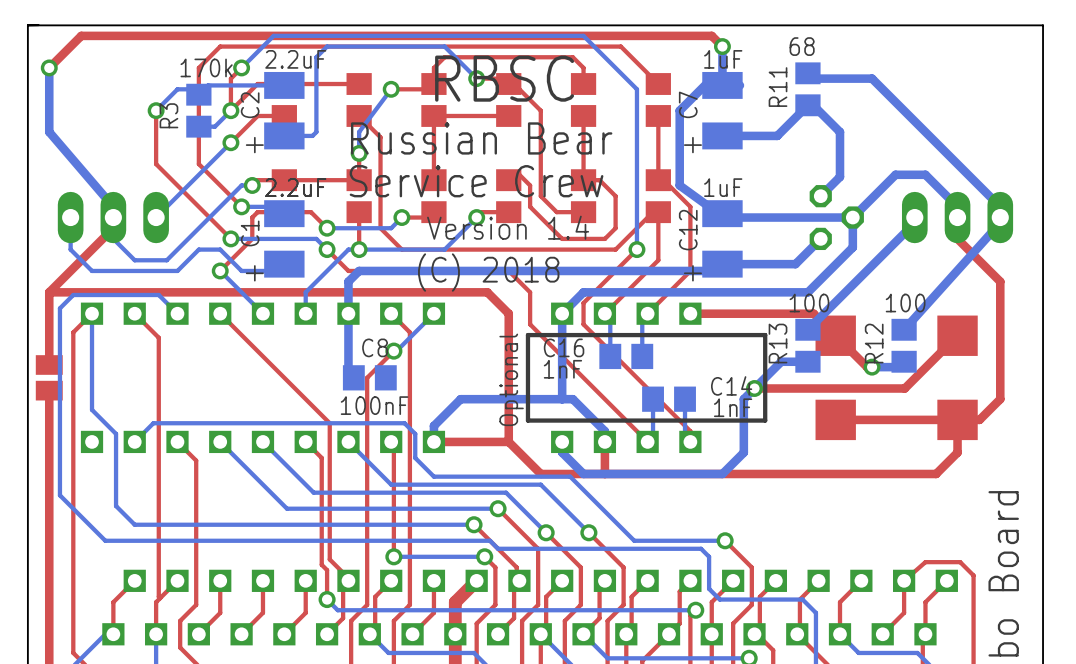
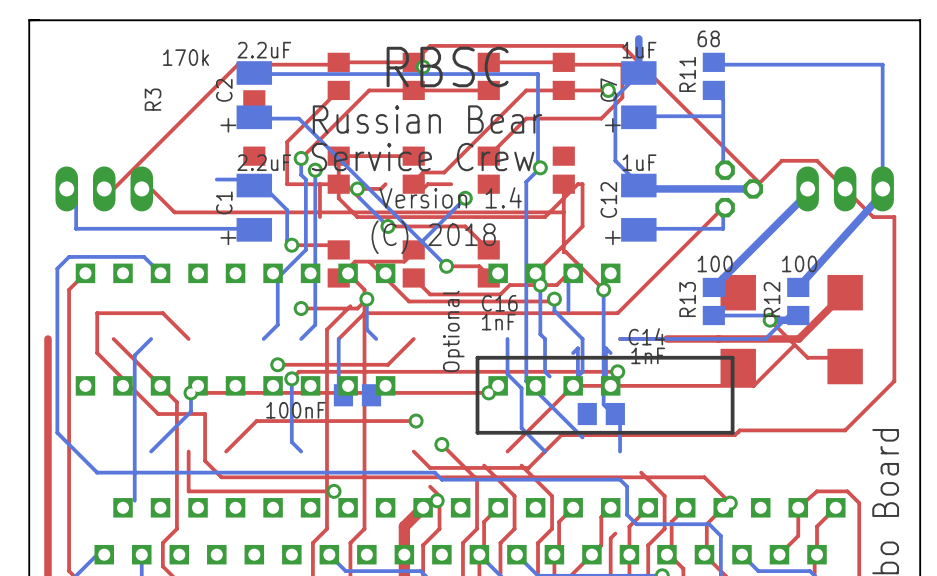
top track: (722, 46) (711, 35) (81, 35) (49, 67) -> none
via: (722, 46) -> none
bottom track: (49, 67) (49, 132) (113, 206) (113, 238) (134, 260) (166, 260) (241, 185) (252, 185) -> none
via: (49, 67) -> none
top track: (241, 67) (230, 78) (230, 110) -> (113, 188) (207, 95)
bottom track: (241, 67) (273, 35) (583, 35) (636, 89) (636, 249) -> none
via: (241, 67) -> none
top track: none -> (488, 62) (622, 64) (622, 97) (601, 118) (526, 118) (488, 156)
bottom track: (807, 73) (813, 78) (872, 78) (1000, 206) -> (713, 62) (713, 64) (882, 64) (882, 179)
top track: (476, 78) (503, 78) (514, 89) (519, 89) (540, 110) (540, 196) (556, 212) (583, 212) -> none
bottom track: (476, 78) (444, 46) (327, 46) (316, 57) (316, 132) (312, 135) (284, 135) -> none
top track: (359, 84) (257, 84) -> (430, 467) (528, 467) (561, 435) (734, 435) (739, 430) (845, 430) (894, 381) (894, 217) (873, 217) (817, 160) (781, 160) (753, 188) (758, 181) (622, 45) (430, 45) (413, 62) (237, 64) (230, 71)
top track: (583, 84) (583, 67) (572, 57) (444, 57) (433, 67) (433, 84) (428, 89) (391, 89) -> none
top track: (658, 84) (620, 46) (220, 46) (198, 67) (198, 164) (241, 206) -> none
bottom track: (284, 85) (208, 85) (198, 94) (193, 89) (177, 89) (156, 110) -> none
bottom track: none -> (263, 73) (538, 74) (538, 167) (540, 167) (526, 181) (526, 381) (582, 437)
bottom track: (739, 85) (722, 85) (713, 76) (679, 110) (679, 185) (718, 213) (722, 213) -> (638, 73) (615, 97) (615, 160) (638, 185)
bottom track: (391, 89) (359, 132) (359, 153) -> none
via: (391, 89) -> none
part: none -> (413, 76)
part: none -> (488, 76)
part position: (359, 99) -> (338, 76)
part: (433, 99) -> none
part: (508, 99) -> none
part: (583, 99) -> none
part position: (658, 99) -> (563, 76)
top track: none -> (338, 90) (287, 142) (287, 184) (345, 184) (359, 198)
top track: none -> (488, 90) (369, 90) (301, 158)
top track: none -> (608, 90) (526, 90) (444, 172) (423, 172) (413, 184)
via: none -> (608, 90)
bottom track: none -> (713, 90) (723, 99) (723, 170) (725, 170)
top track: (156, 110) (156, 164) (230, 238) -> none
via: (156, 110) -> none
part: (198, 110) -> none
bottom track: (230, 110) (214, 126) (198, 126) -> none
via: (230, 110) -> none
top track: (284, 115) (257, 115) (230, 142) -> none
top track: (359, 115) (380, 137) (380, 180) -> (413, 156) (338, 156)
top track: (508, 115) (433, 115) (433, 180) -> none
top track: (583, 115) (583, 180) (599, 180) (615, 196) (615, 228) (604, 238) (562, 238) (530, 206) (530, 185) (519, 174) (514, 174) (508, 180) -> none
top track: (658, 115) (658, 180) (663, 180) (690, 206) (690, 270) (647, 313) -> none
bottom track: none -> (263, 117) (298, 118) (446, 266)
bottom track: (722, 135) (777, 135) (807, 105) (813, 105) (839, 132) (839, 176) (820, 196) -> (638, 117) (723, 116)
bottom track: (230, 142) (156, 217) -> none
via: (230, 142) -> none
top track: (359, 153) (359, 180) (257, 180) (252, 185) -> none
via: (359, 153) -> none
bottom track: none -> (301, 158) (301, 174) (305, 179) (305, 249) (277, 278) (277, 324) (263, 338)
via: none -> (301, 158)
via: (252, 185) -> none
via: none -> (540, 167)
bottom track: none -> (315, 170) (315, 324) (301, 338)
via: none -> (315, 170)
part position: (359, 196) -> (338, 170)
part: (433, 196) -> none
part: none -> (413, 170)
part: (508, 196) -> none
part: none -> (488, 170)
part: (583, 196) -> none
part position: (658, 196) -> (563, 170)
via: (241, 206) -> none
top track: none -> (563, 184) (563, 252) (566, 252) (603, 289)
bottom track: none -> (263, 185) (287, 210) (287, 240) (291, 245)
bottom track: (70, 217) (70, 249) (92, 270) (177, 270) (198, 249) (220, 249) (241, 270) (277, 270) (284, 264) (280, 260) -> none
bottom track: none -> (76, 188) (76, 228) (263, 229)
top track: (113, 217) (113, 228) (49, 292) -> none
top track: none -> (151, 188) (174, 212) (563, 212)
bottom track: (401, 217) (391, 228) (327, 228) -> none
bottom track: (476, 217) (444, 249) (348, 249) (305, 292) (305, 313) -> none
via: (476, 217) -> none
top track: (957, 217) (957, 238) (1000, 281) (1000, 399) (979, 419) (835, 419) -> none
bottom track: (957, 217) (957, 206) (925, 174) (895, 174) (852, 217) (852, 247) (807, 292) (583, 292) (562, 313) (562, 399) -> none
top track: (327, 228) (311, 212) (257, 212) (252, 217) (252, 238) (220, 270) -> none
via: (327, 228) -> none
bottom track: none -> (359, 198) (387, 226)
bottom track: none -> (465, 198) (421, 241)
via: none -> (465, 198)
bottom track: (230, 238) (316, 238) (327, 249) -> none
via: (230, 238) -> none
top track: none -> (725, 207) (617, 313) (364, 313) (338, 338)
bottom track: (820, 238) (795, 264) (722, 264) (707, 270) (359, 270) (348, 281) (348, 372) (353, 377) -> (725, 207) (723, 207) (723, 228) (638, 229)
top track: (327, 249) (348, 270) (508, 270) (530, 292) (530, 324) (647, 441) -> none
via: (327, 249) -> none
via: (359, 249) -> none
top track: (636, 249) (583, 303) (583, 324) (690, 431) (690, 441) -> none
via: (636, 249) -> none
top track: none -> (387, 226) (465, 226) (488, 249)
via: none -> (387, 226)
bottom track: (220, 270) (262, 313) -> none
via: (220, 270) -> none
top track: none -> (291, 245) (334, 245) (338, 249)
via: none -> (291, 245)
top track: none -> (413, 249) (404, 261) (355, 261) (341, 275) (338, 275) (338, 277)
top track: (49, 292) (487, 292) (508, 313) (508, 441) -> none
top track: (49, 292) (49, 364) -> none
top track: none -> (369, 261) (409, 301) (552, 301) (554, 299)
part: none -> (338, 263)
part: none -> (413, 263)
part: none -> (488, 263)
top track: none -> (446, 266) (479, 266) (488, 277)
via: none -> (446, 266)
bottom track: (92, 313) (92, 409) (116, 433) (116, 506) (134, 524) (474, 524) -> none
top track: (134, 313) (158, 337) (160, 598) -> none
top track: (220, 313) (329, 423) (329, 559) (345, 575) (345, 580) (348, 580) (343, 586) (343, 618) (327, 634) -> none
bottom track: (433, 313) (396, 351) (393, 351) -> none
top track: (690, 313) (813, 313) (867, 367) (872, 367) -> none
top track: none -> (563, 278) (556, 285) (509, 285) (500, 294) (430, 294) (413, 278)
via: none -> (540, 285)
via: none -> (603, 289)
line: (765, 335) (527, 335) (527, 420) (765, 420) (765, 335) -> none
top track: none -> (366, 299) (357, 308) (301, 308)
bottom track: none -> (366, 299) (366, 329) (376, 338)
bottom track: none -> (554, 299) (554, 310) (582, 338) (582, 371) (577, 376)
via: none -> (554, 299)
text: C8 (375, 347) -> none
via position: (393, 351) -> (366, 299)
via: none -> (301, 308)
bottom track: none -> (540, 310) (540, 334) (545, 338) (545, 371) (549, 376)
part: (626, 356) -> none
bottom track: (807, 361) (781, 361) (743, 399) (743, 452) (722, 473) (695, 473) -> (620, 451) (620, 418) (615, 414)
top track: none -> (765, 315) (807, 357) (845, 358)
bottom track: none -> (765, 315) (713, 315)
bottom track: none -> (788, 315) (765, 338) (620, 338)
part: (49, 377) -> none
part position: (369, 377) -> (357, 395)
top track: none -> (113, 338) (160, 385)
bottom track: none -> (151, 338) (134, 355) (134, 500)
top track: none -> (188, 338) (162, 313) (97, 313) (97, 353) (158, 414) (205, 414) (205, 460) (221, 477) (704, 477) (730, 503)
bottom track: none -> (338, 338) (338, 390) (343, 395)
top track: none -> (413, 338) (387, 364) (277, 364)
bottom track: none -> (507, 338) (507, 374) (521, 388) (521, 428) (545, 451)
via: (754, 388) -> none
top track: none -> (794, 344) (753, 385) (573, 385) (507, 451)
part: (669, 399) -> none
text position: 100nF (374, 405) -> 100nF (295, 410)
line: none -> (732, 357) (477, 357) (477, 432) (732, 432) (732, 357)
via: none -> (277, 364)
top track: (957, 420) (957, 452) (936, 473) (540, 473) (508, 441) -> none
top track: none -> (617, 371) (298, 371) (291, 378)
via: none -> (617, 371)
bottom track: none -> (291, 378) (291, 442) (301, 451)
via: none -> (291, 378)
bottom track: (134, 441) (153, 423) (404, 423) (415, 433) (415, 457) (433, 476) (570, 476) (634, 540) (725, 540) -> none
bottom track: (220, 441) (287, 508) (498, 508) -> none
bottom track: (262, 441) (313, 492) (506, 492) (546, 532) -> none
top track: (305, 441) (321, 457) (321, 564) (327, 570) (327, 599) -> none
bottom track: (348, 441) (391, 484) (540, 484) (588, 532) -> none
top track: (391, 441) (393, 444) (393, 556) -> none
top track: (508, 441) (433, 441) -> none
bottom track: (562, 441) (562, 452) (583, 473) (693, 473) -> (603, 289) (603, 404) (613, 414)
top track: (604, 441) (604, 473) -> none
bottom track: (604, 441) (604, 431) (572, 399) (460, 399) (433, 425) (433, 441) -> none
bottom track: none -> (191, 392) (191, 411) (151, 451)
via: none -> (191, 392)
top track: none -> (488, 392) (191, 392)
via: none -> (488, 392)
part: none -> (601, 414)
top track: none -> (416, 421) (256, 421) (226, 451)
via: none -> (416, 421)
top track: none -> (188, 451) (188, 491) (334, 491)
top track: none -> (413, 451) (420, 458)
via: (474, 524) -> none
via: (546, 532) -> none
via: (588, 532) -> none
top track: (484, 535) (516, 567) (516, 580) (519, 580) (514, 586) (514, 618) (498, 634) -> none
via: (725, 540) -> none
via position: (393, 556) -> (334, 491)
bottom track: (484, 556) (393, 556) -> none
via position: (484, 556) -> (437, 500)
via: none -> (730, 503)
top track: (134, 580) (113, 602) (113, 634) -> none
top track: (177, 580) (156, 602) (156, 634) -> none
top track: (220, 580) (220, 612) (198, 634) -> none
top track: (262, 580) (262, 612) (241, 634) -> none
top track: (305, 580) (305, 612) (284, 634) -> none
top track: (391, 580) (375, 596) (375, 628) (369, 634) -> none
top track: (433, 580) (433, 612) (412, 634) -> none
top track: (604, 580) (599, 586) (599, 618) (583, 634) -> none
top track: (861, 580) (839, 602) (839, 634) -> none
bottom track: (327, 599) (337, 610) (695, 610) -> none
via: (327, 599) -> none
via: (695, 610) -> none

